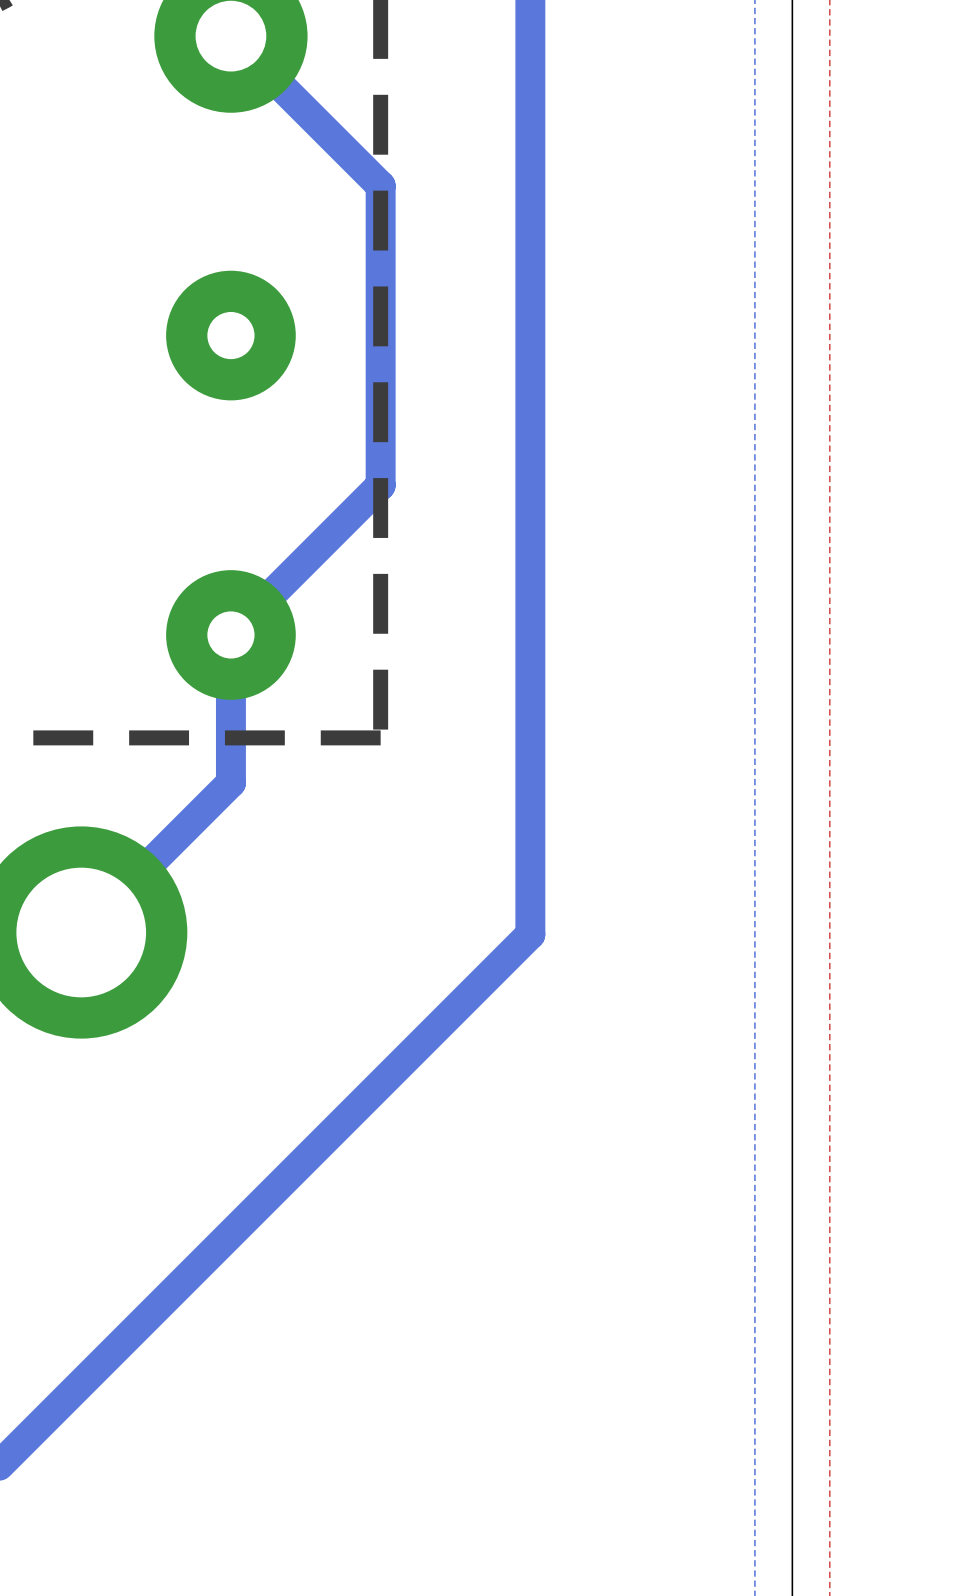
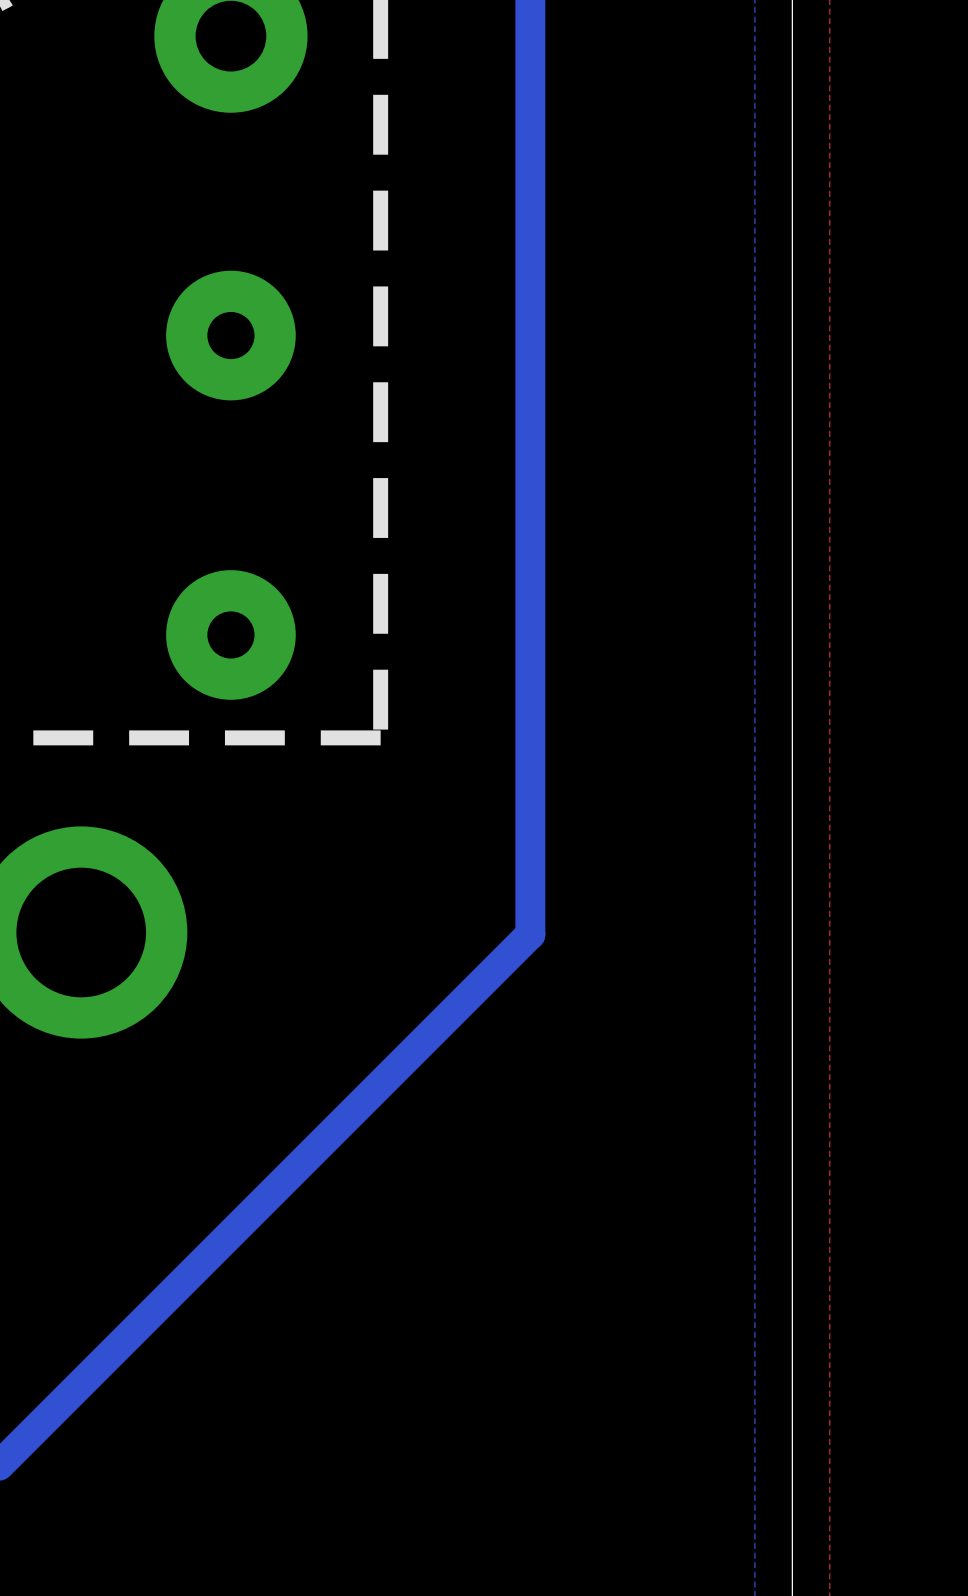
bottom track: (230, 36) (380, 185) (380, 485) (230, 634) (230, 782) (81, 932) -> none

